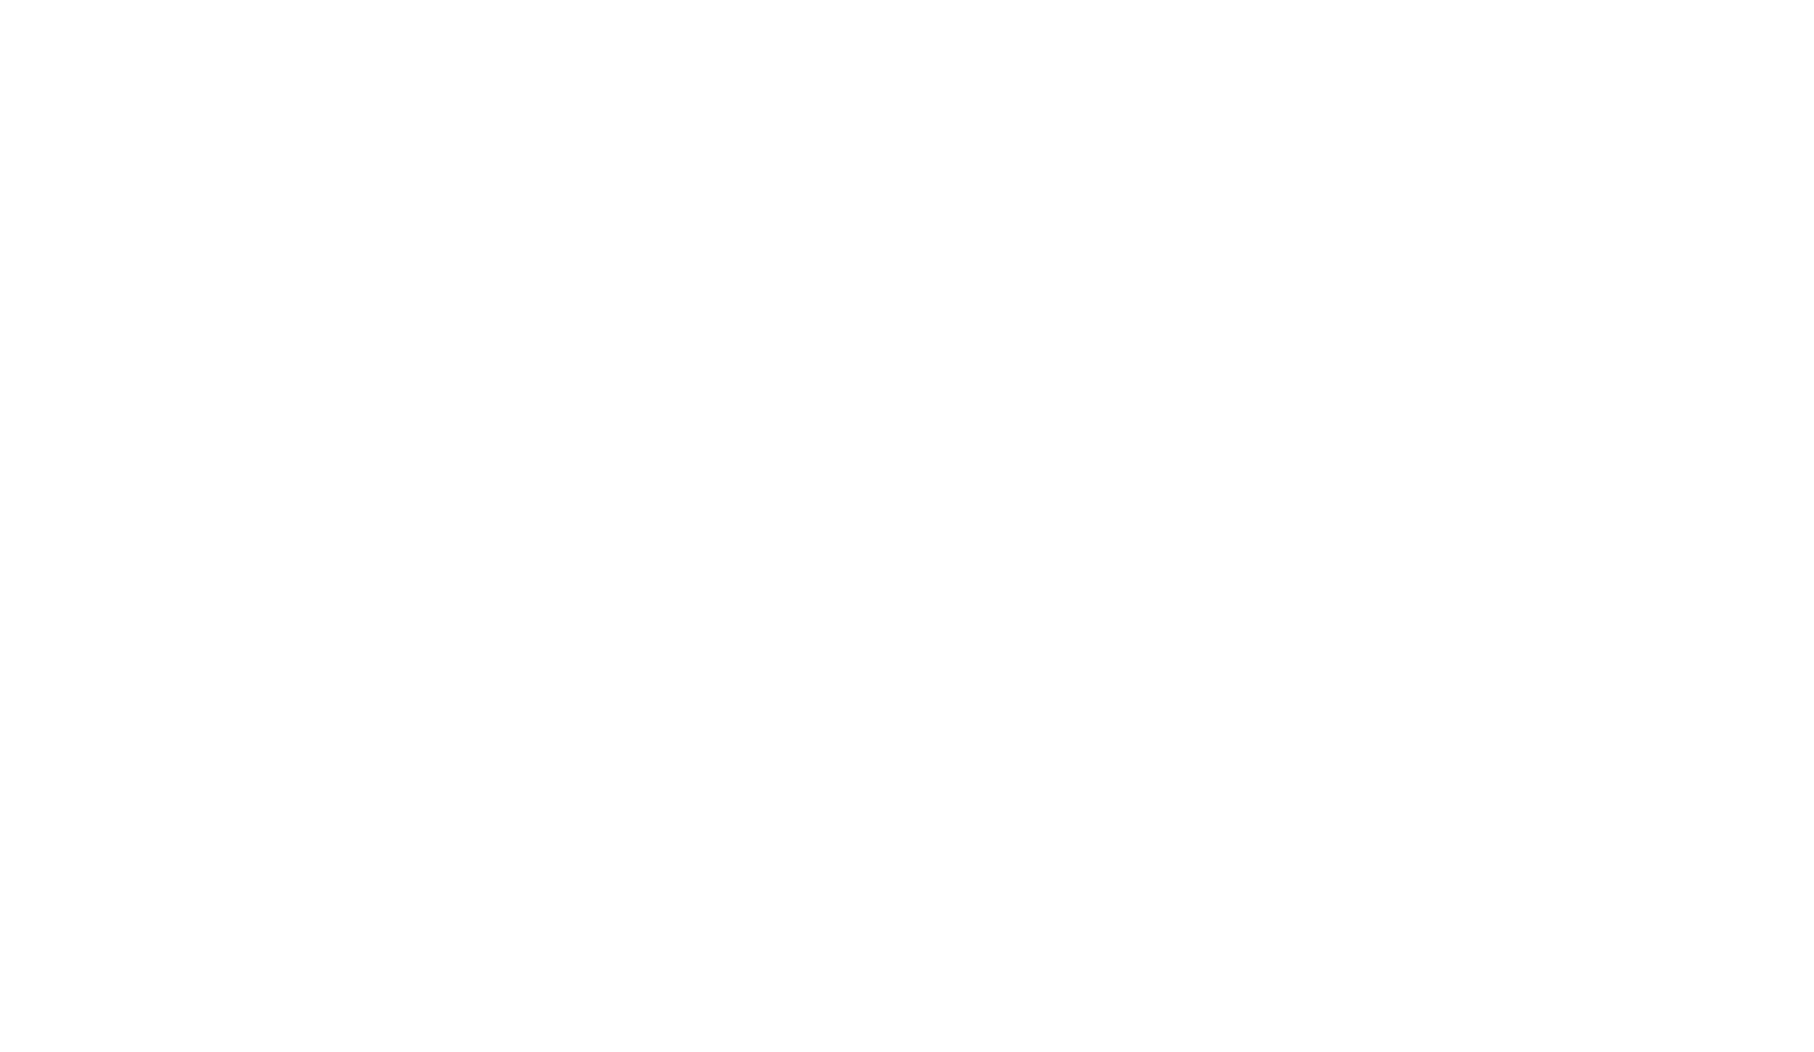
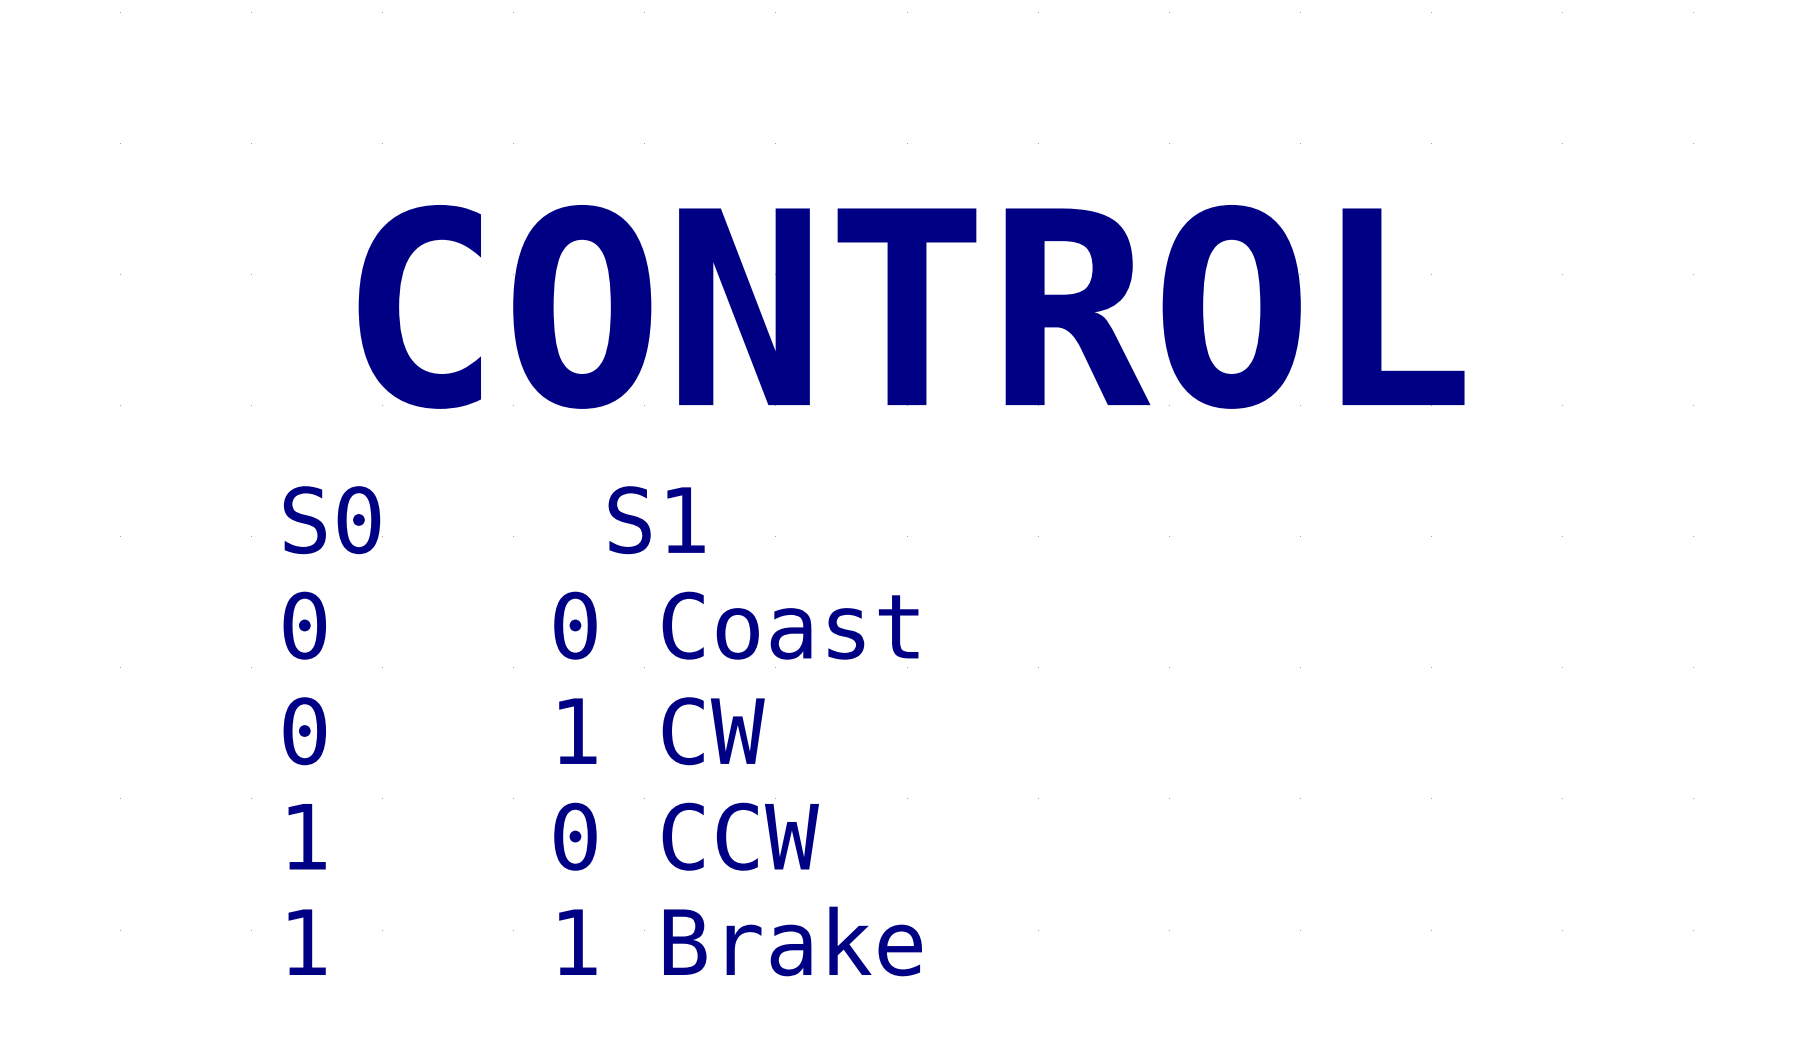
text: none -> CONTROL (911, 306)
text: none -> S0 S1 (494, 520)
text: none -> 0 0 Coast (601, 625)
text: none -> 0 1 CW (524, 731)
text: none -> 1 0 CCW (553, 836)
text: none -> 1 1 Brake (605, 941)

